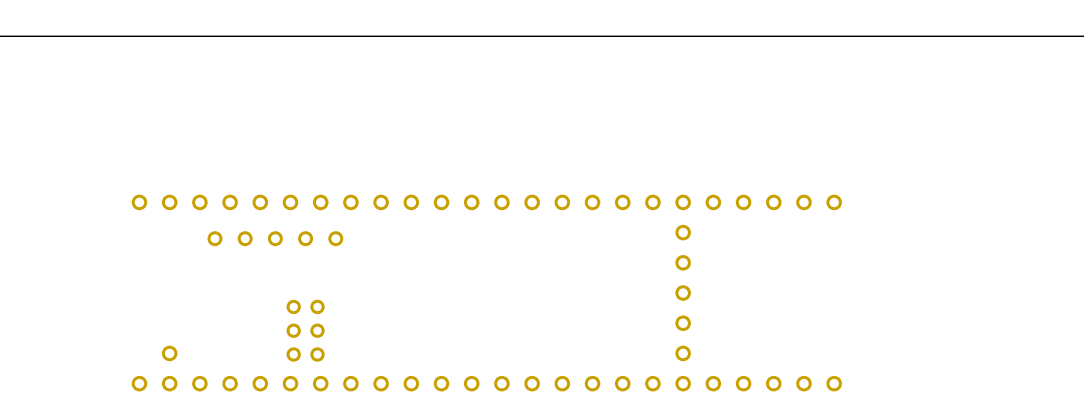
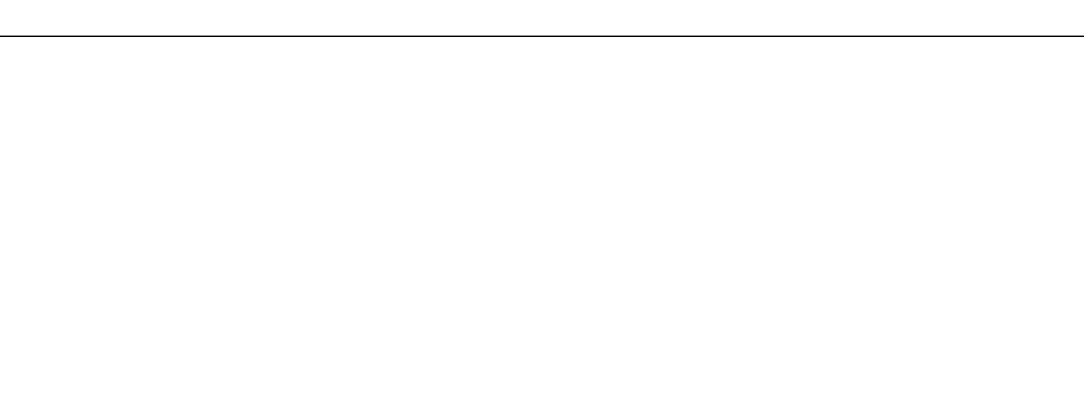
part: (486, 293) -> none

